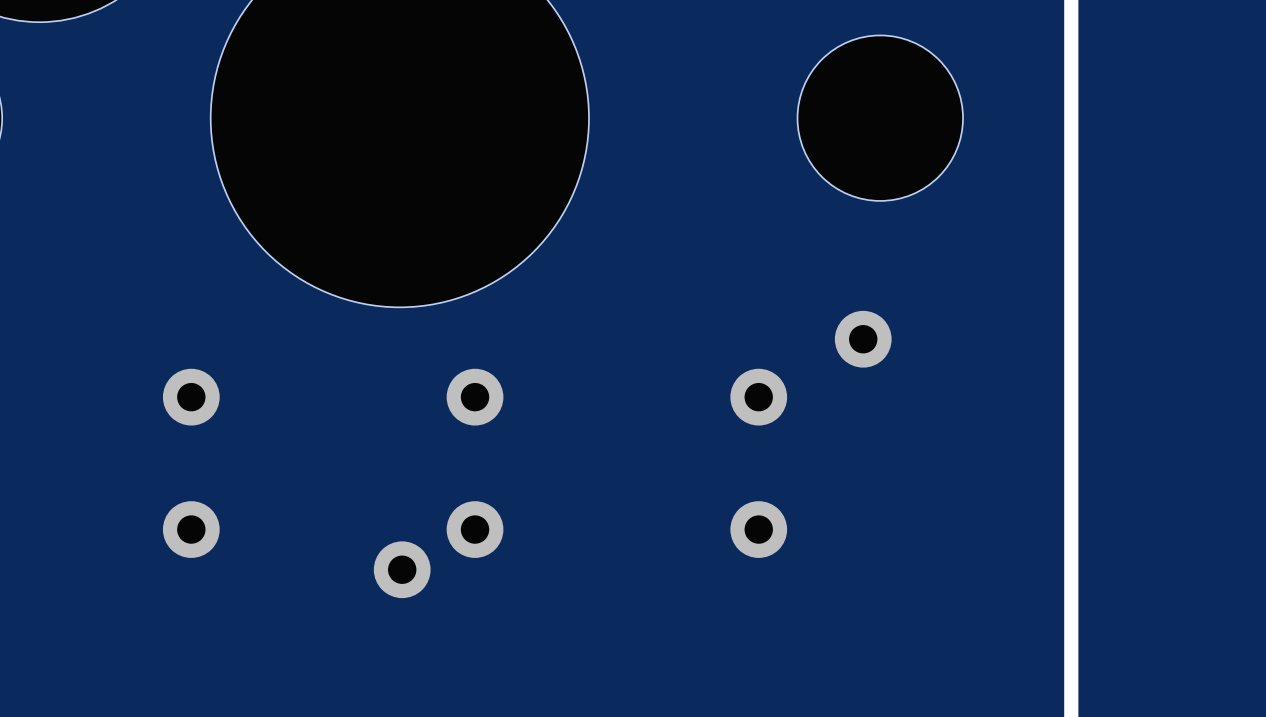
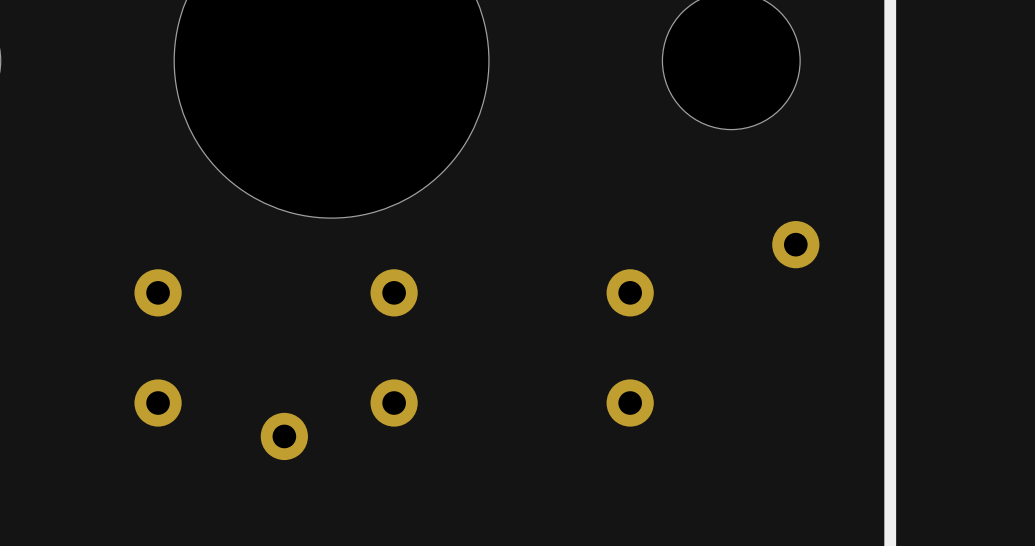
via position: (863, 339) -> (795, 244)
via position: (402, 569) -> (284, 436)

